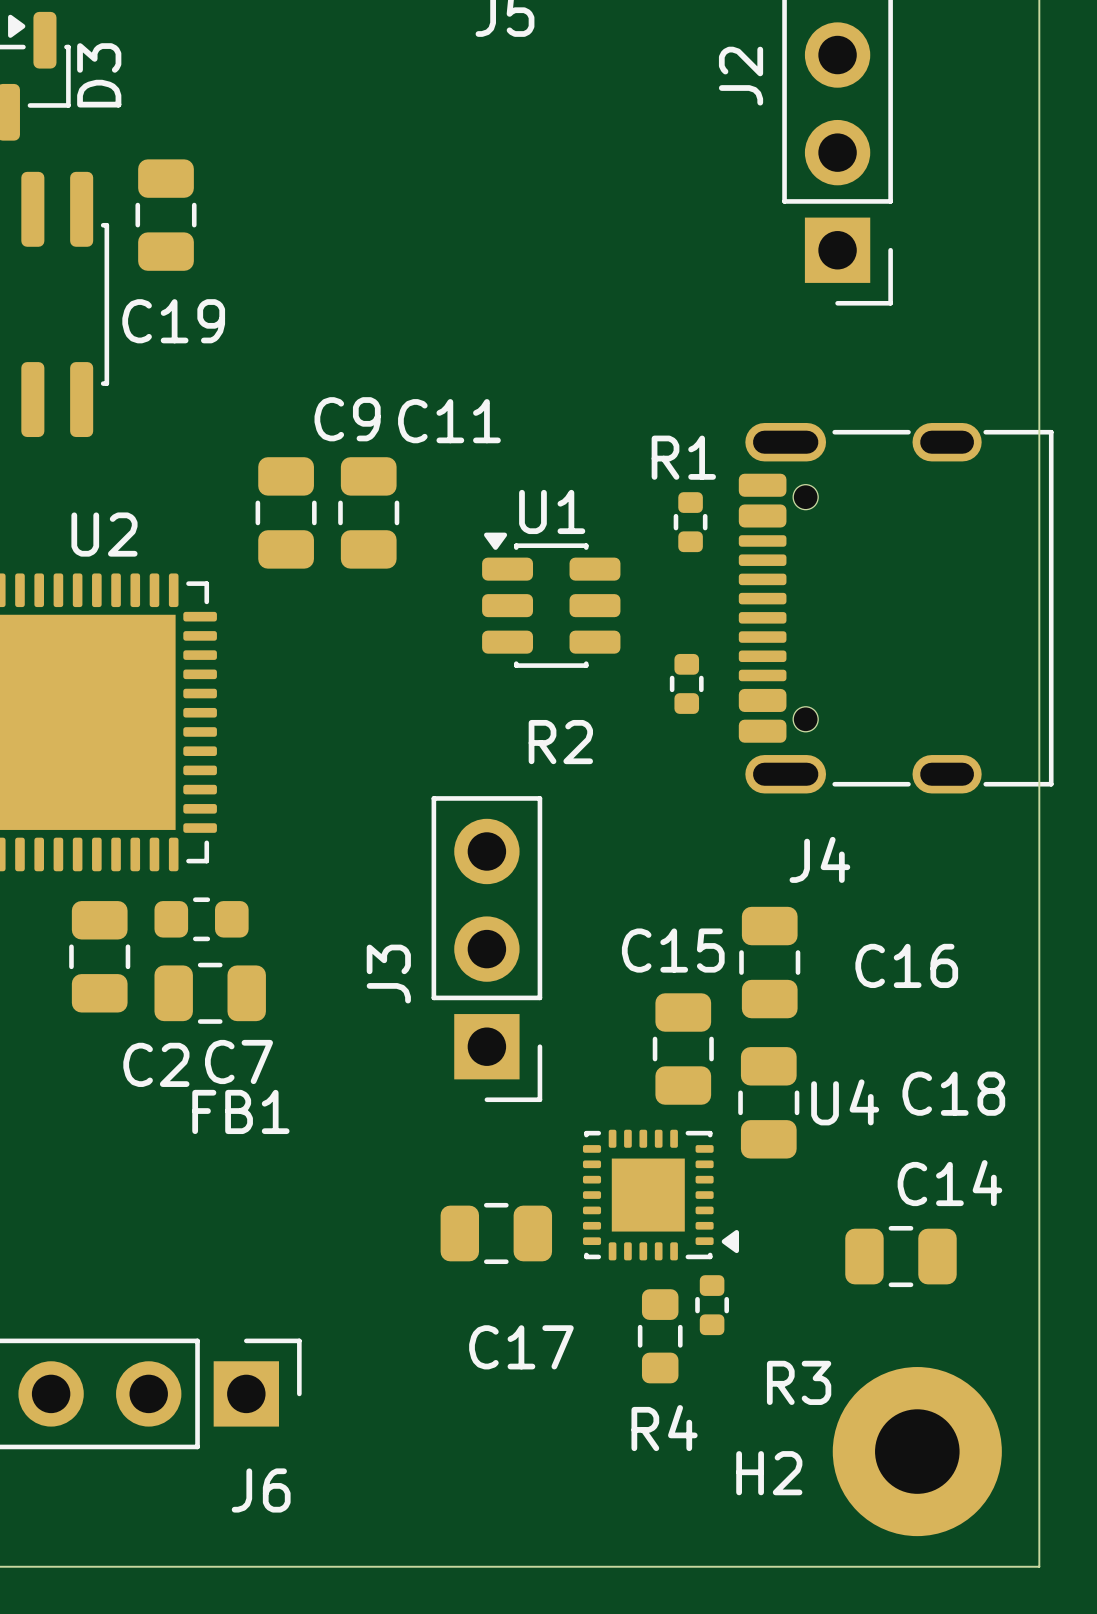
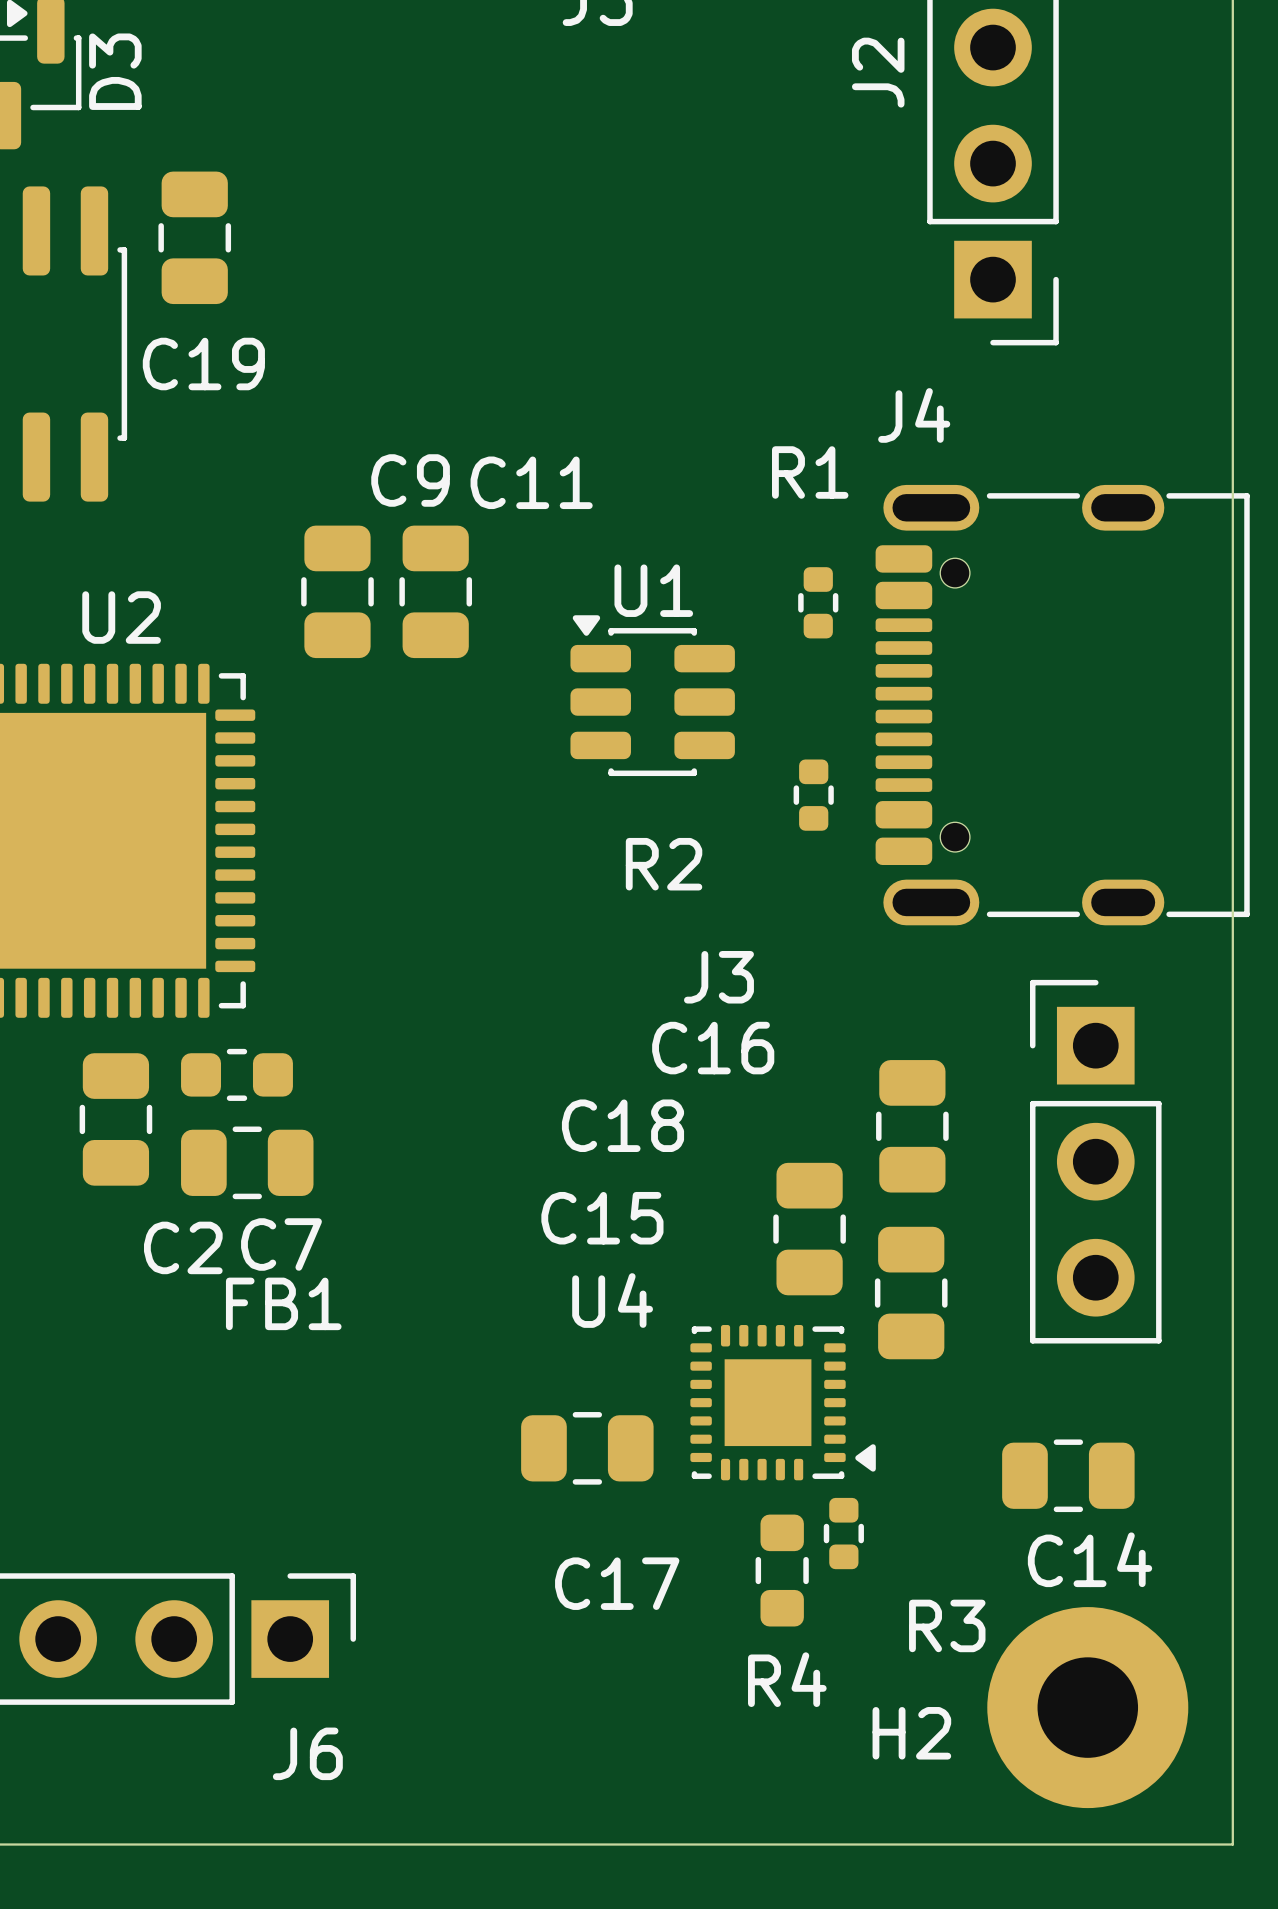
R1 name position: R1 (683, 457) -> R1 (810, 472)
J4 name position: J4 (819, 859) -> J4 (914, 415)
J3 rotation: 0° (486, 949) -> 180° (1095, 1161)
J3 position: (486, 949) -> (1095, 1161)
C15 name position: C15 (673, 950) -> C15 (602, 1218)
C16 name position: C16 (906, 965) -> C16 (713, 1048)
J3 name position: J3 (388, 974) -> J3 (718, 977)
C18 name position: C18 (953, 1093) -> C18 (622, 1125)
U4 name position: U4 (845, 1102) -> U4 (612, 1300)
C14 name position: C14 (949, 1183) -> C14 (1090, 1559)

